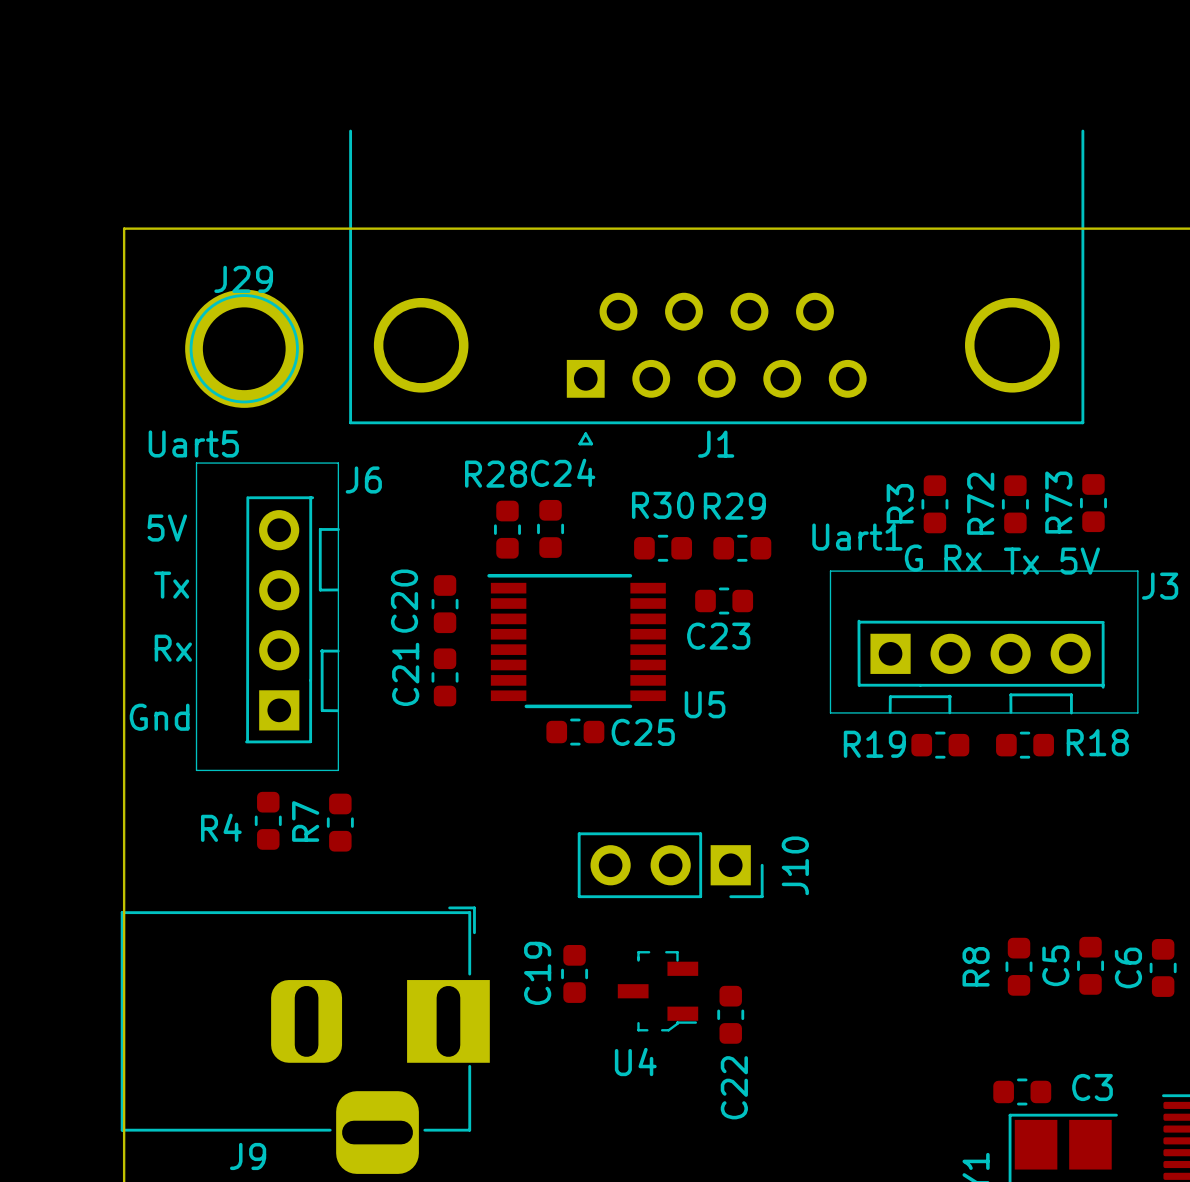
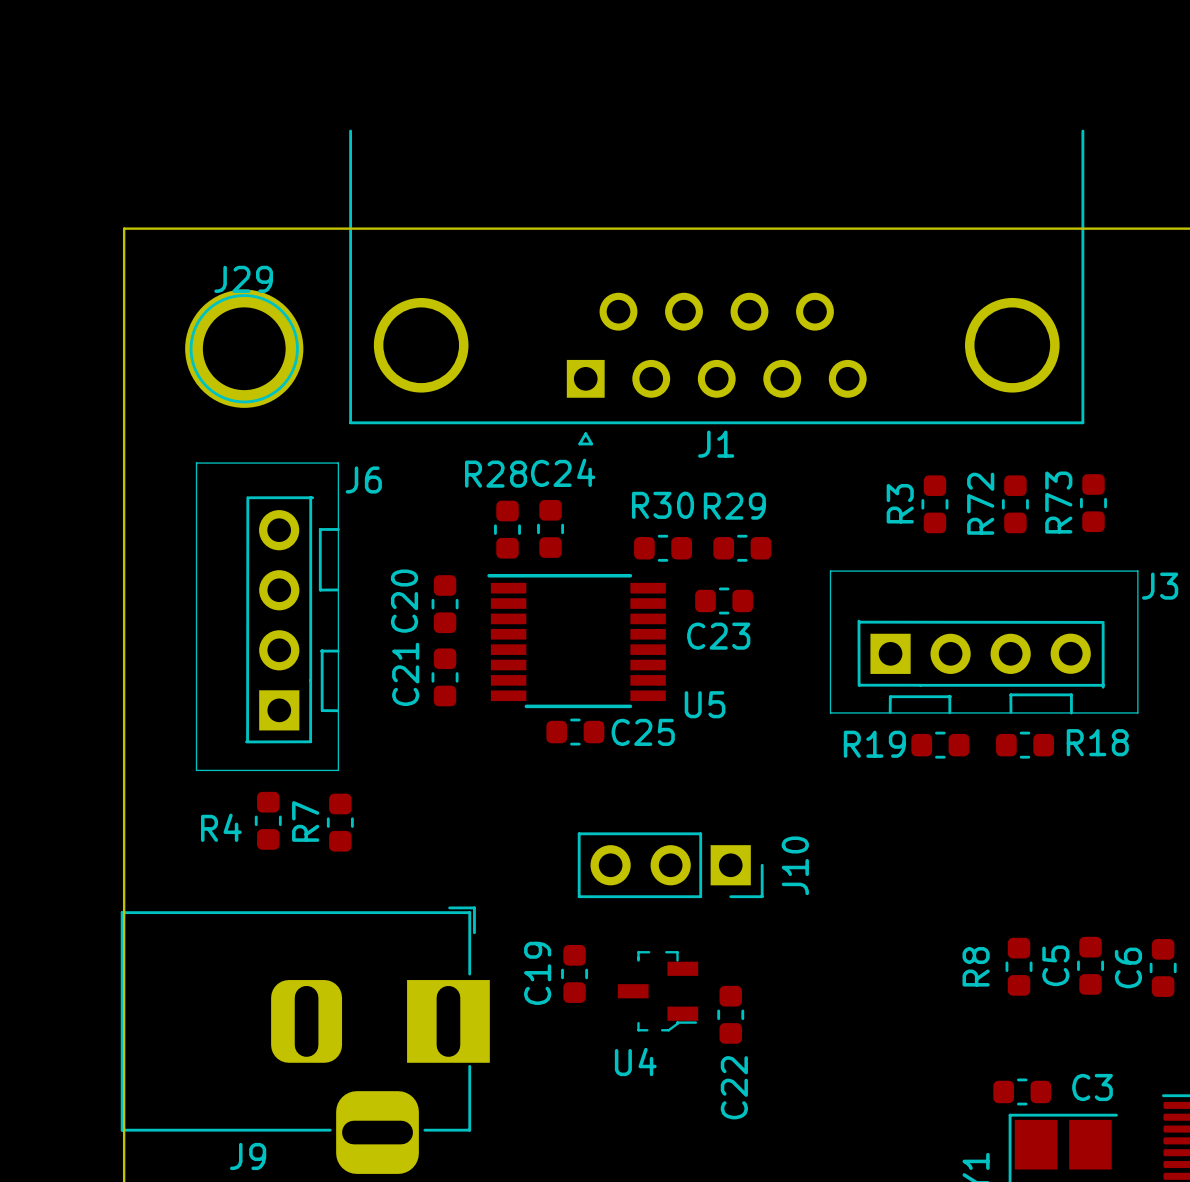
text: Uart5 (193, 443) -> none
text: 5V (167, 528) -> none
text: Uart1 (857, 537) -> none
text: G (913, 558) -> none
text: Rx (963, 558) -> none
text: Tx (1021, 561) -> none
text: 5V (1080, 561) -> none
text: Tx (171, 585) -> none
text: Rx (173, 648) -> none
text: Gnd (159, 717) -> none

